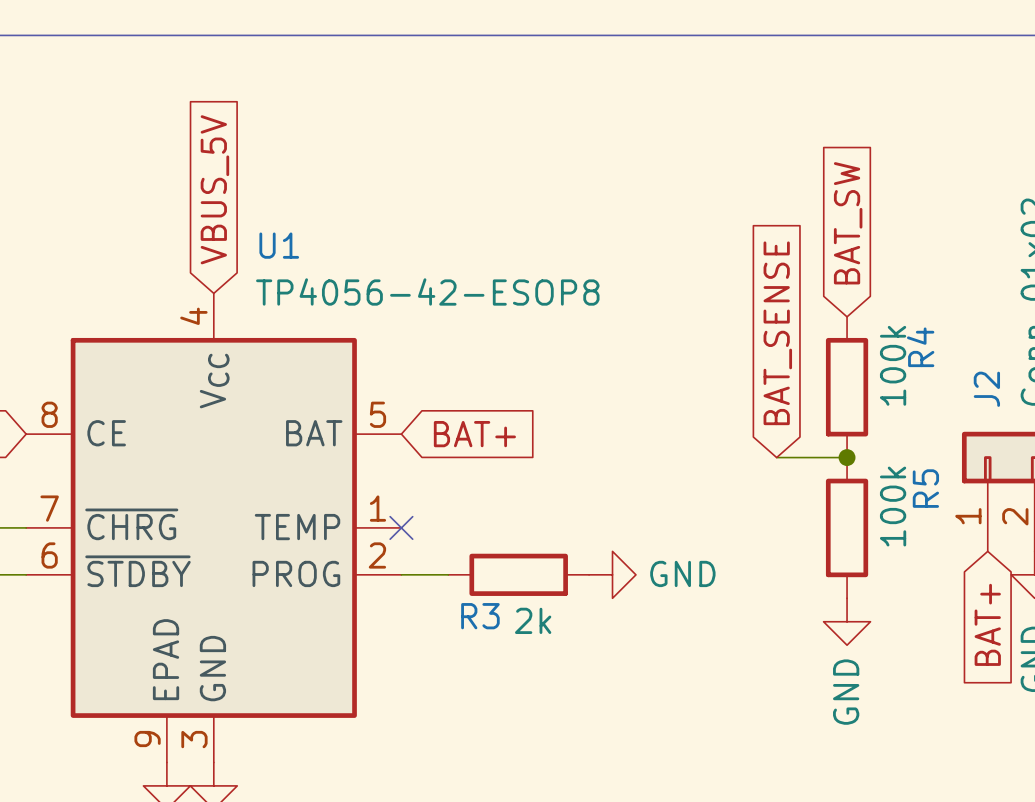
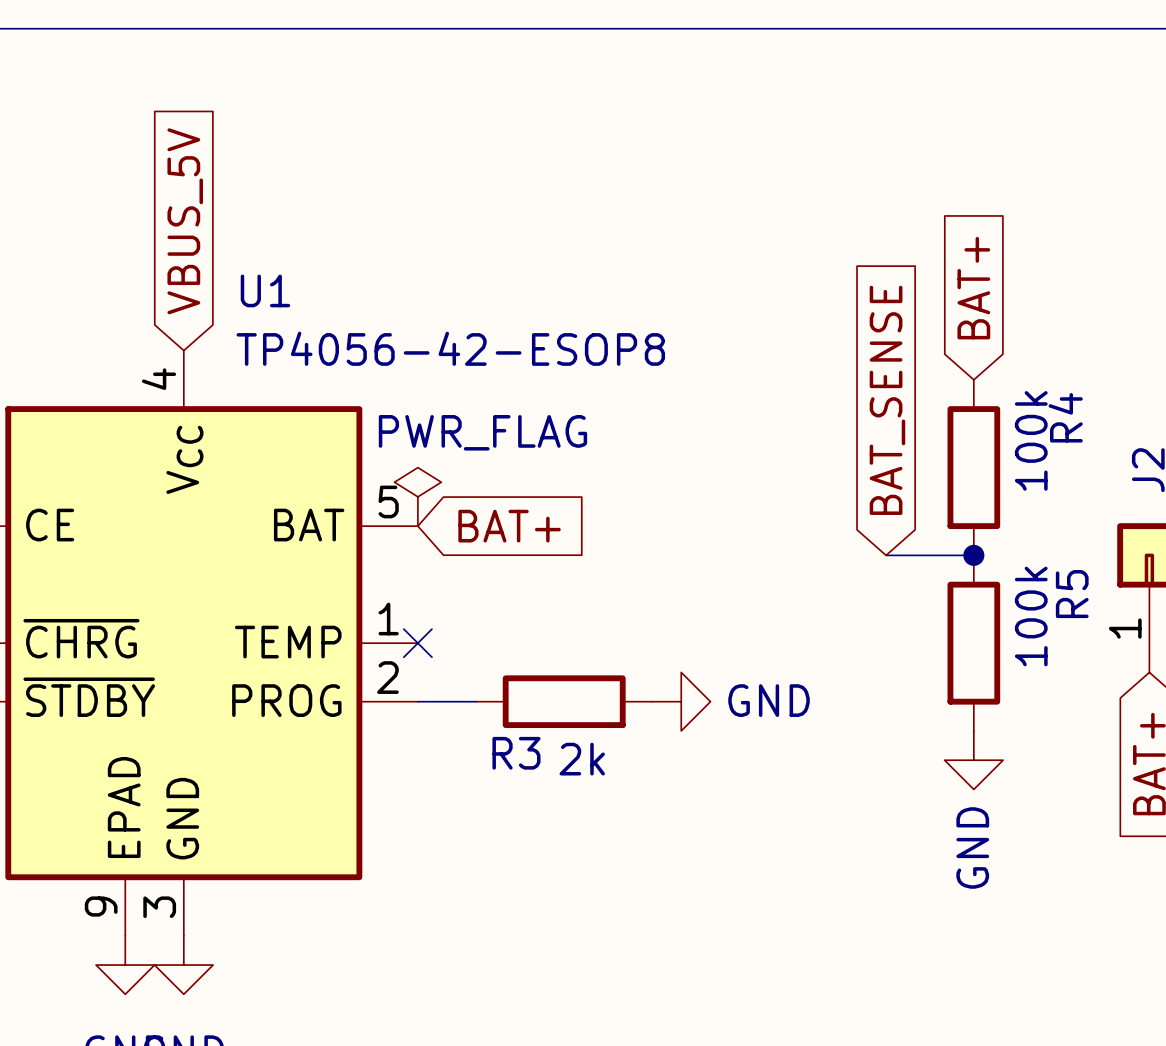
global label: BAT_SW (848, 223) -> BAT+ (973, 288)
power symbol: none -> PWR_FLAG (417, 496)

